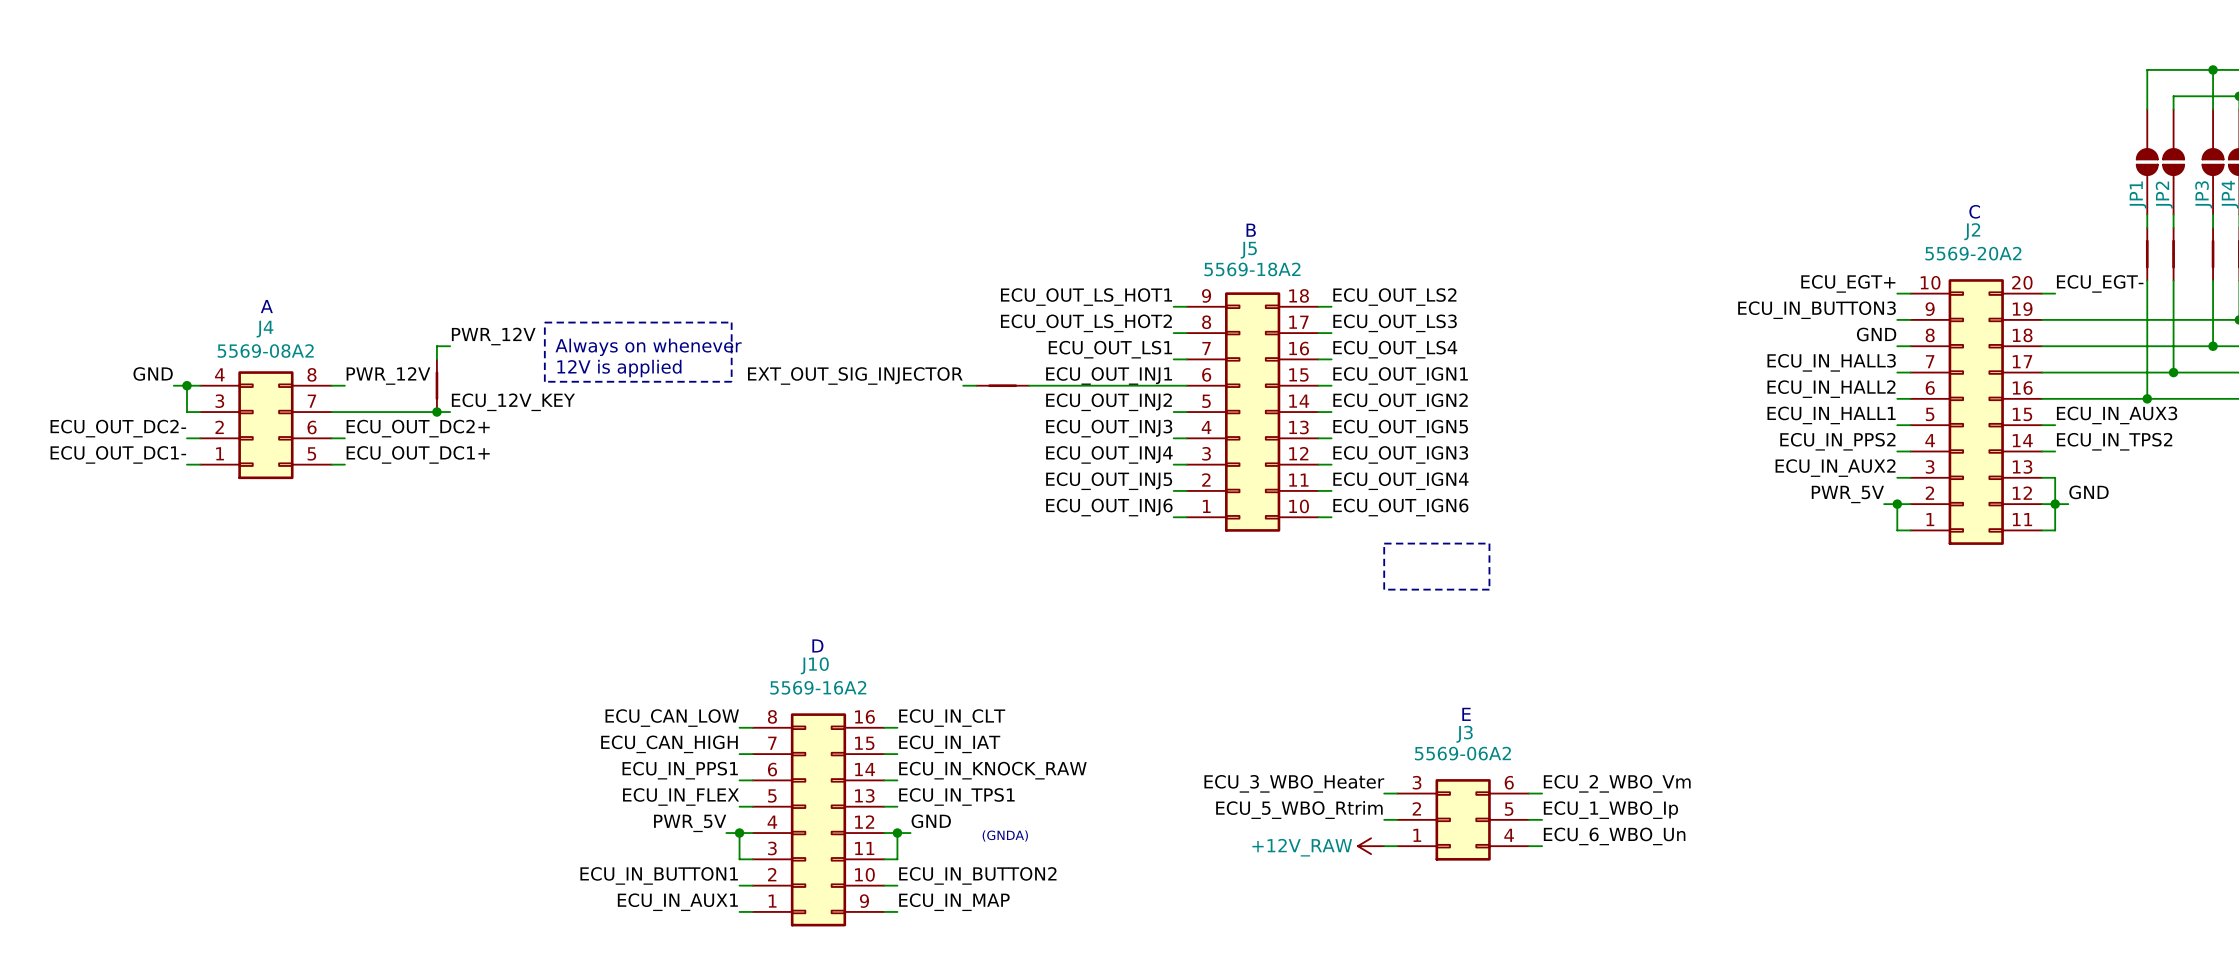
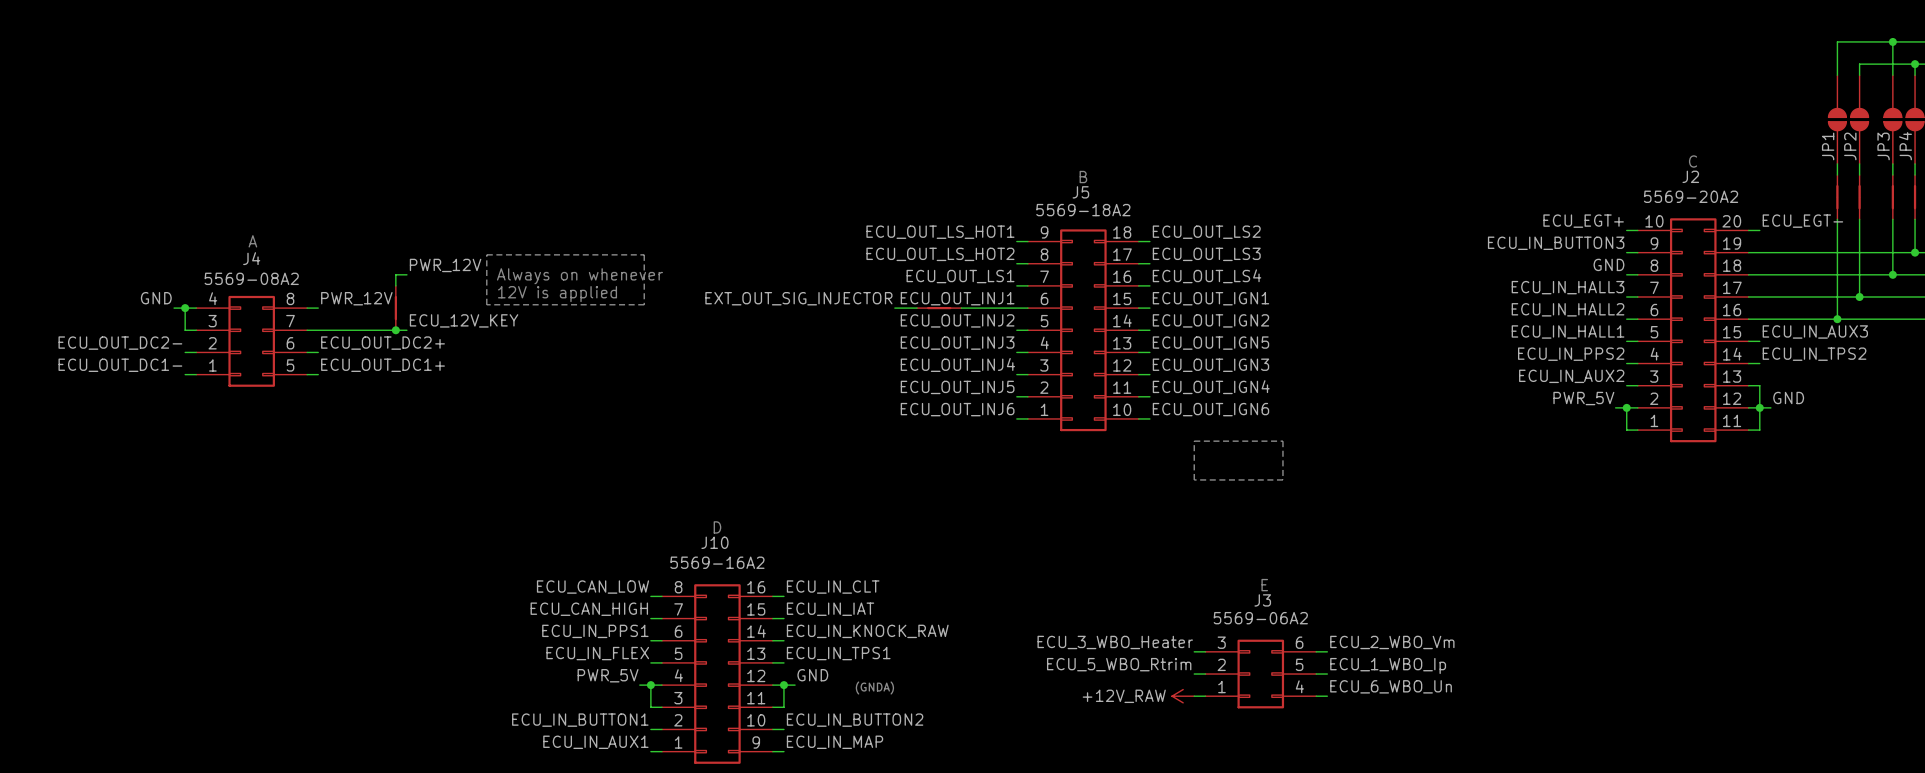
label position: EXT_OUT_SIG_INJECTOR (855, 375) -> EXT_OUT_SIG_INJECTOR (798, 298)
wire: (963, 385) (976, 385) -> none
part position: (1002, 385) -> (939, 308)

